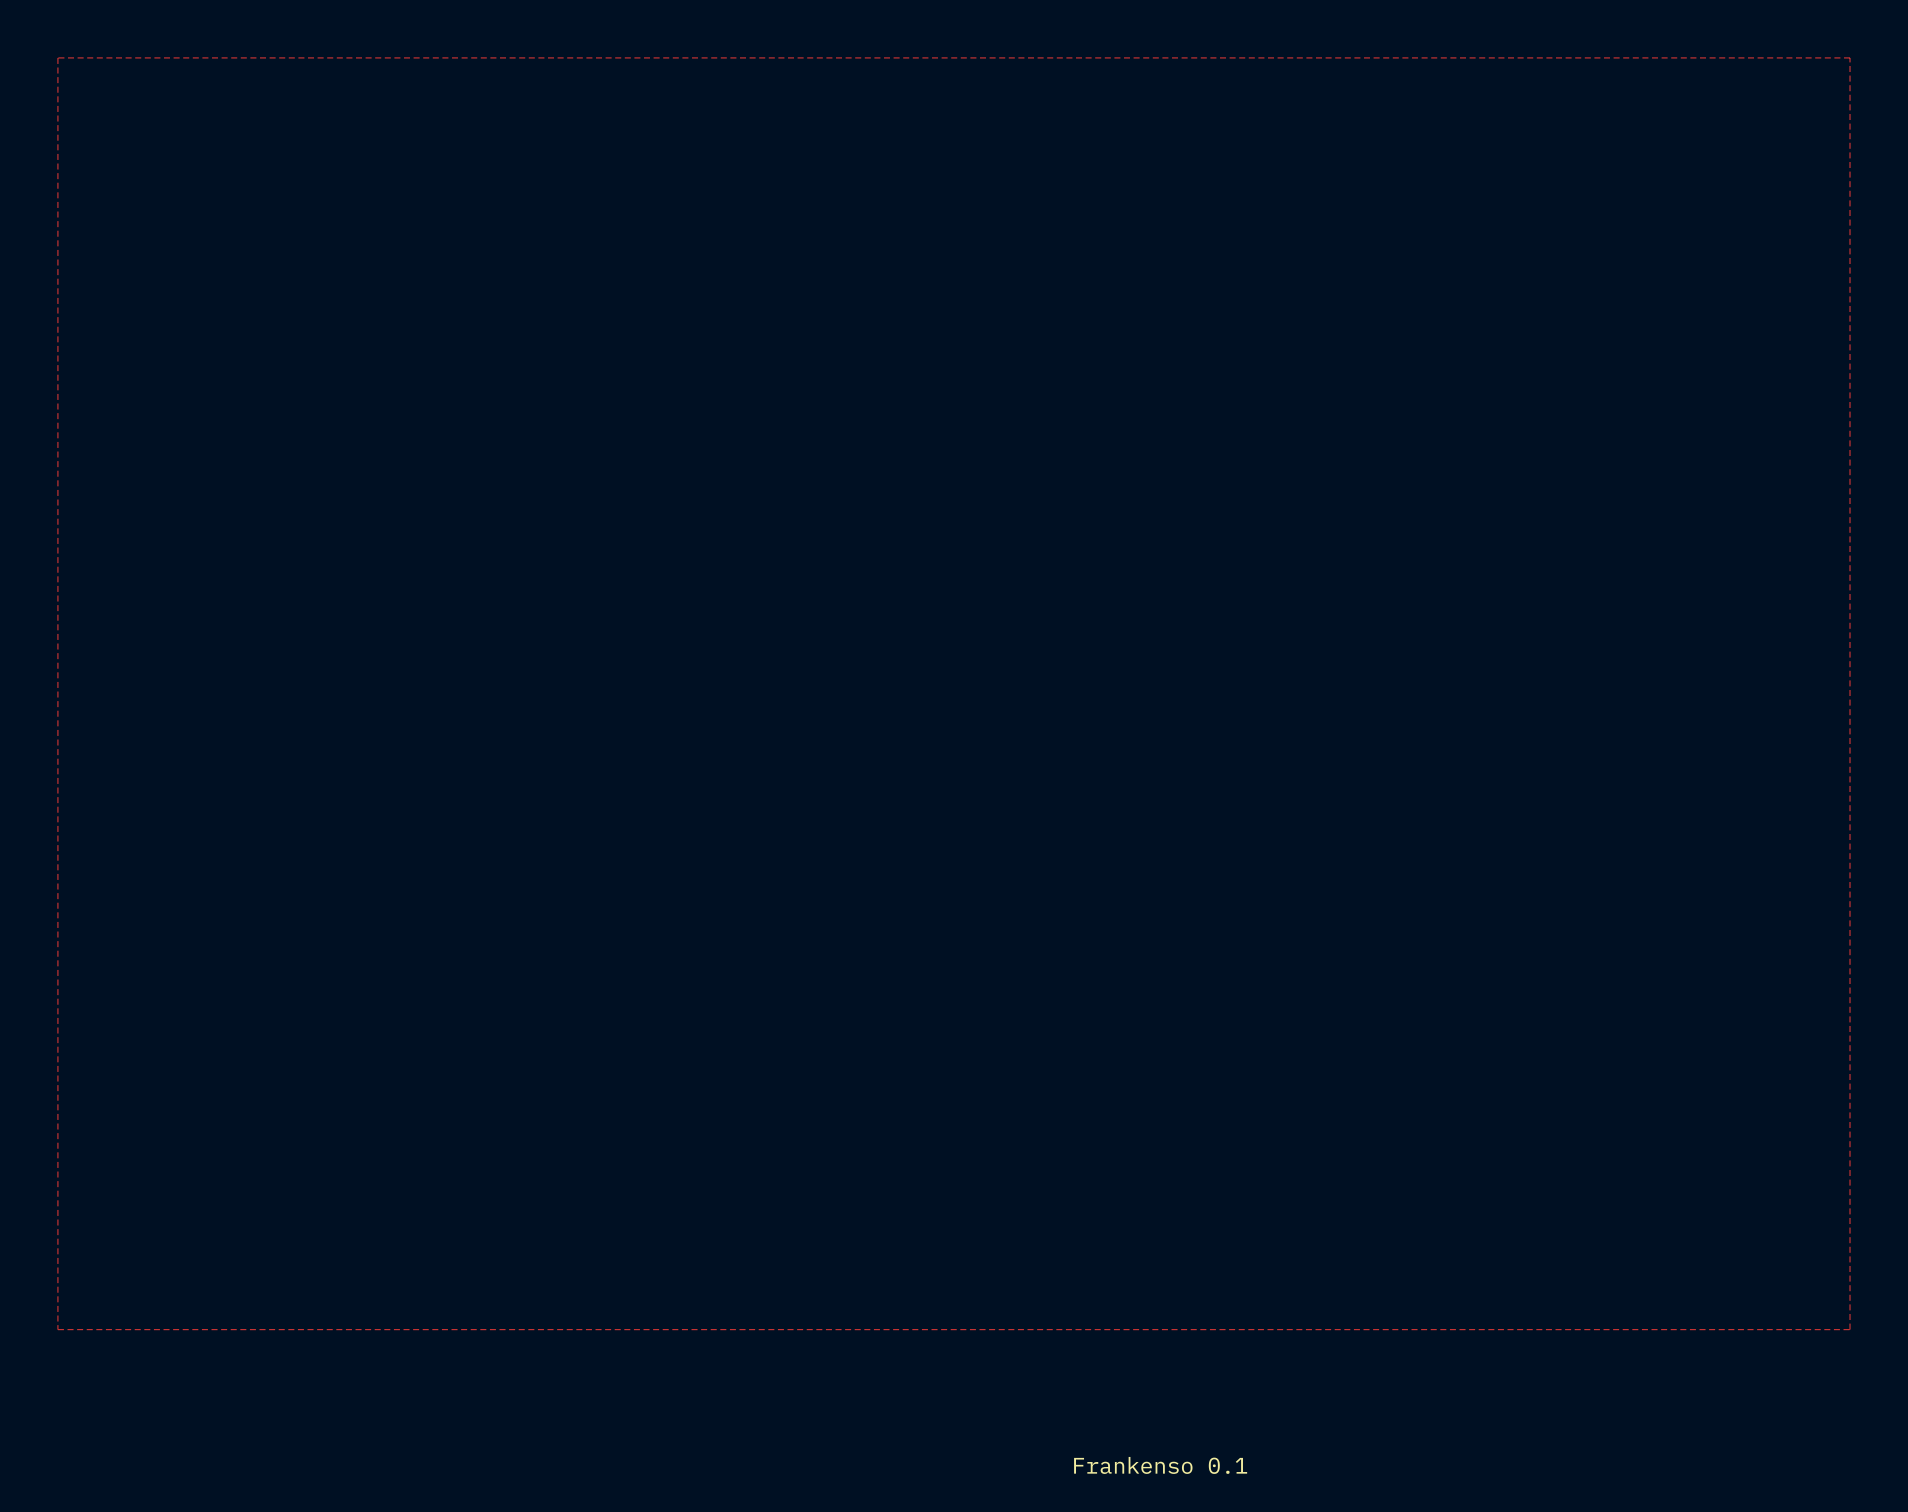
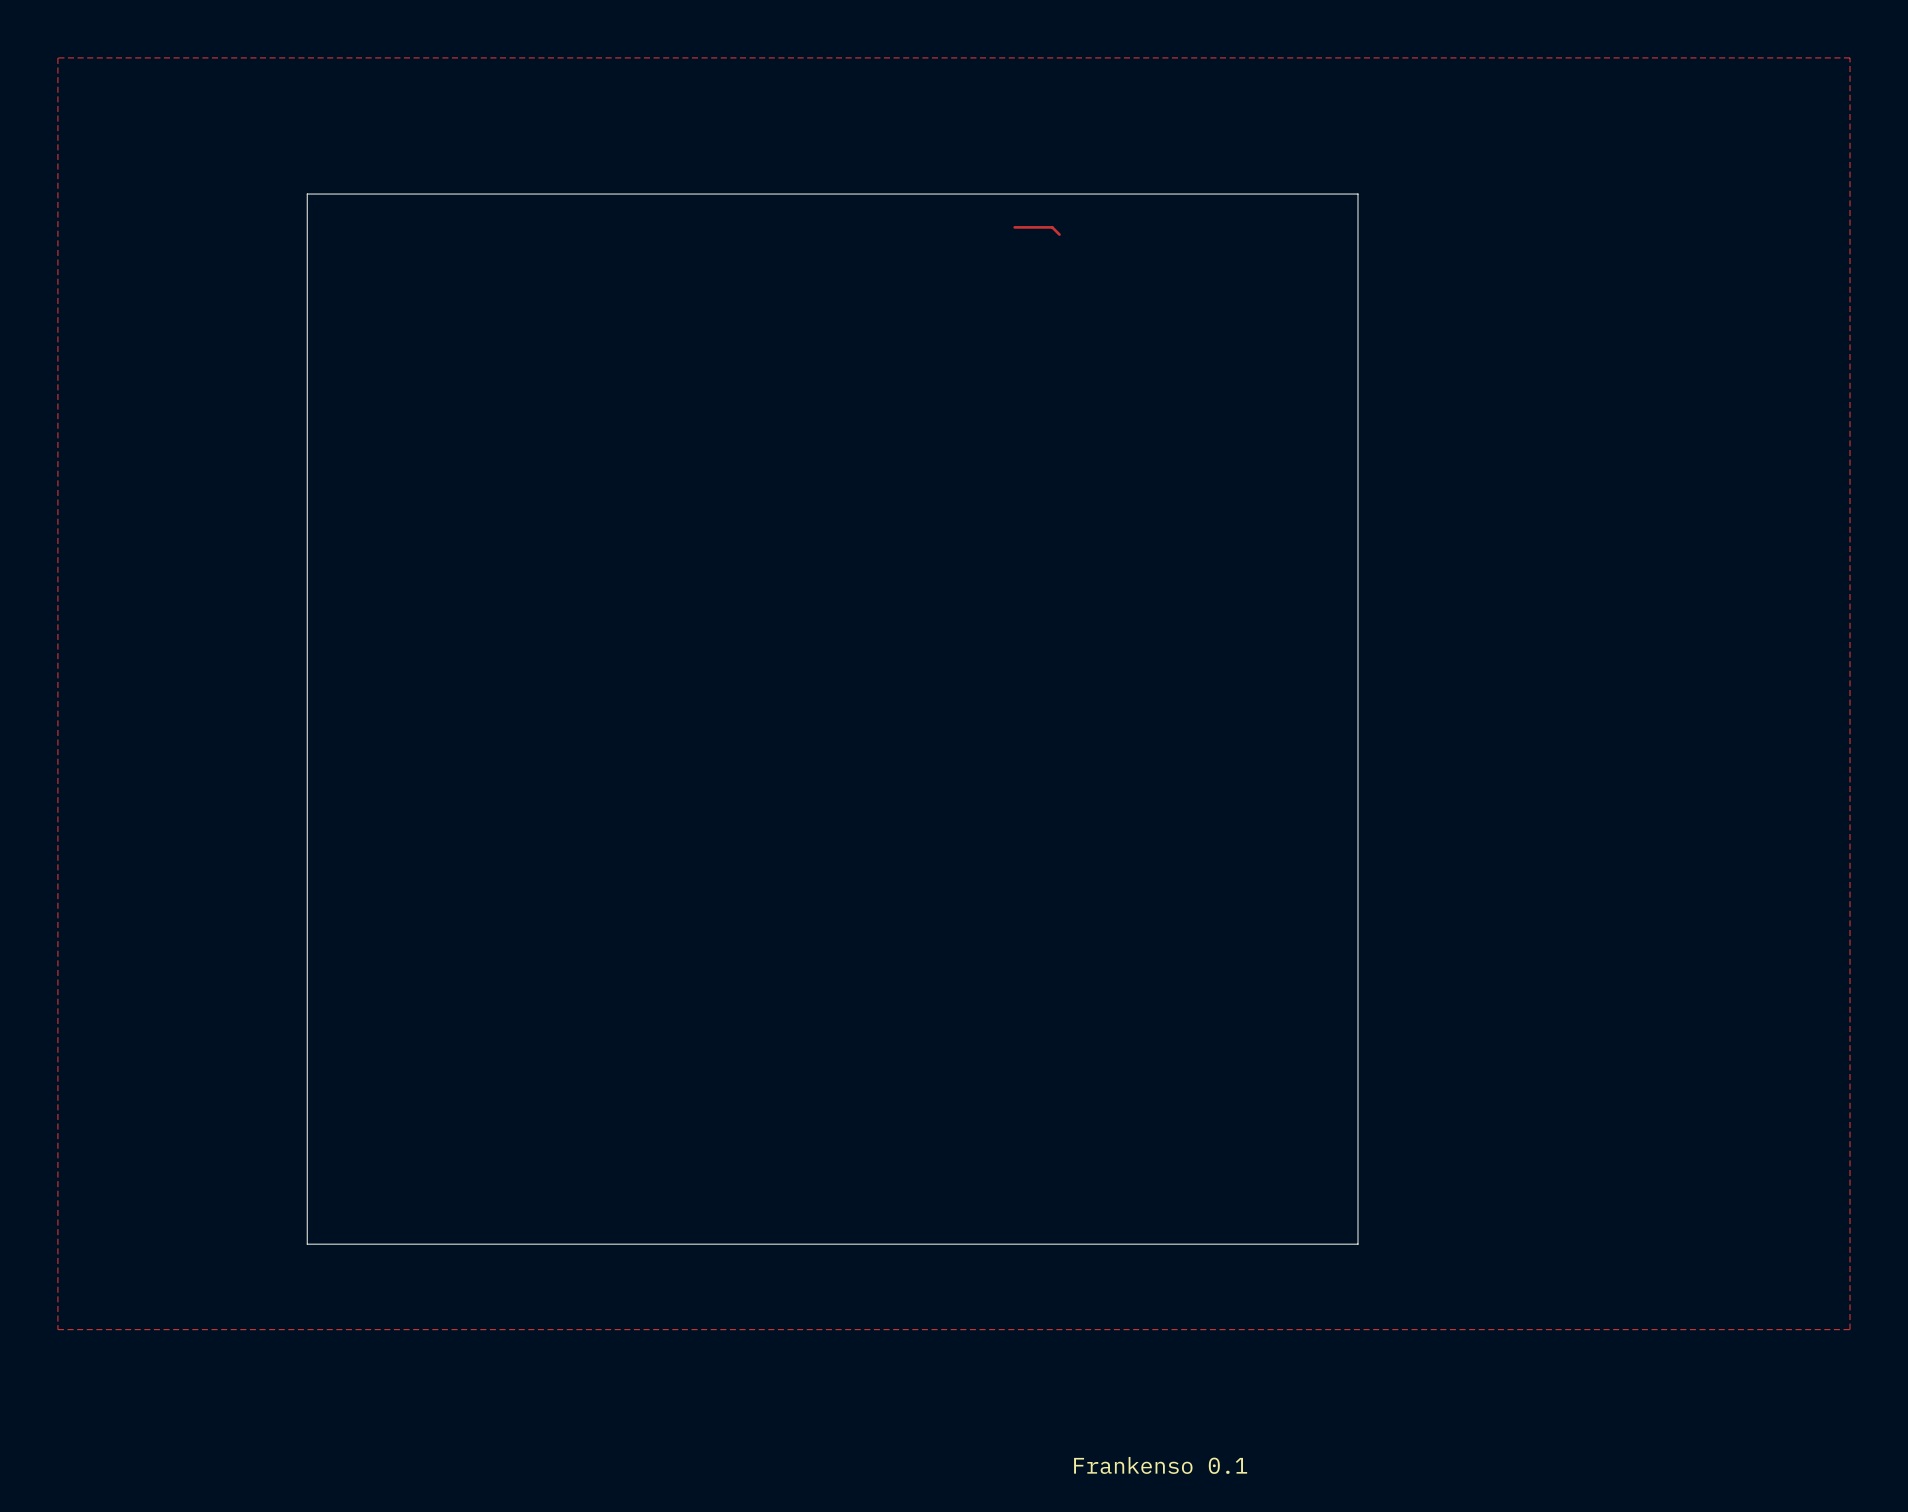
board edge: none -> (307, 194) (307, 1244) (1357, 1244) (1357, 194) (307, 194)
track: none -> (1014, 227) (1052, 227) (1059, 234)

